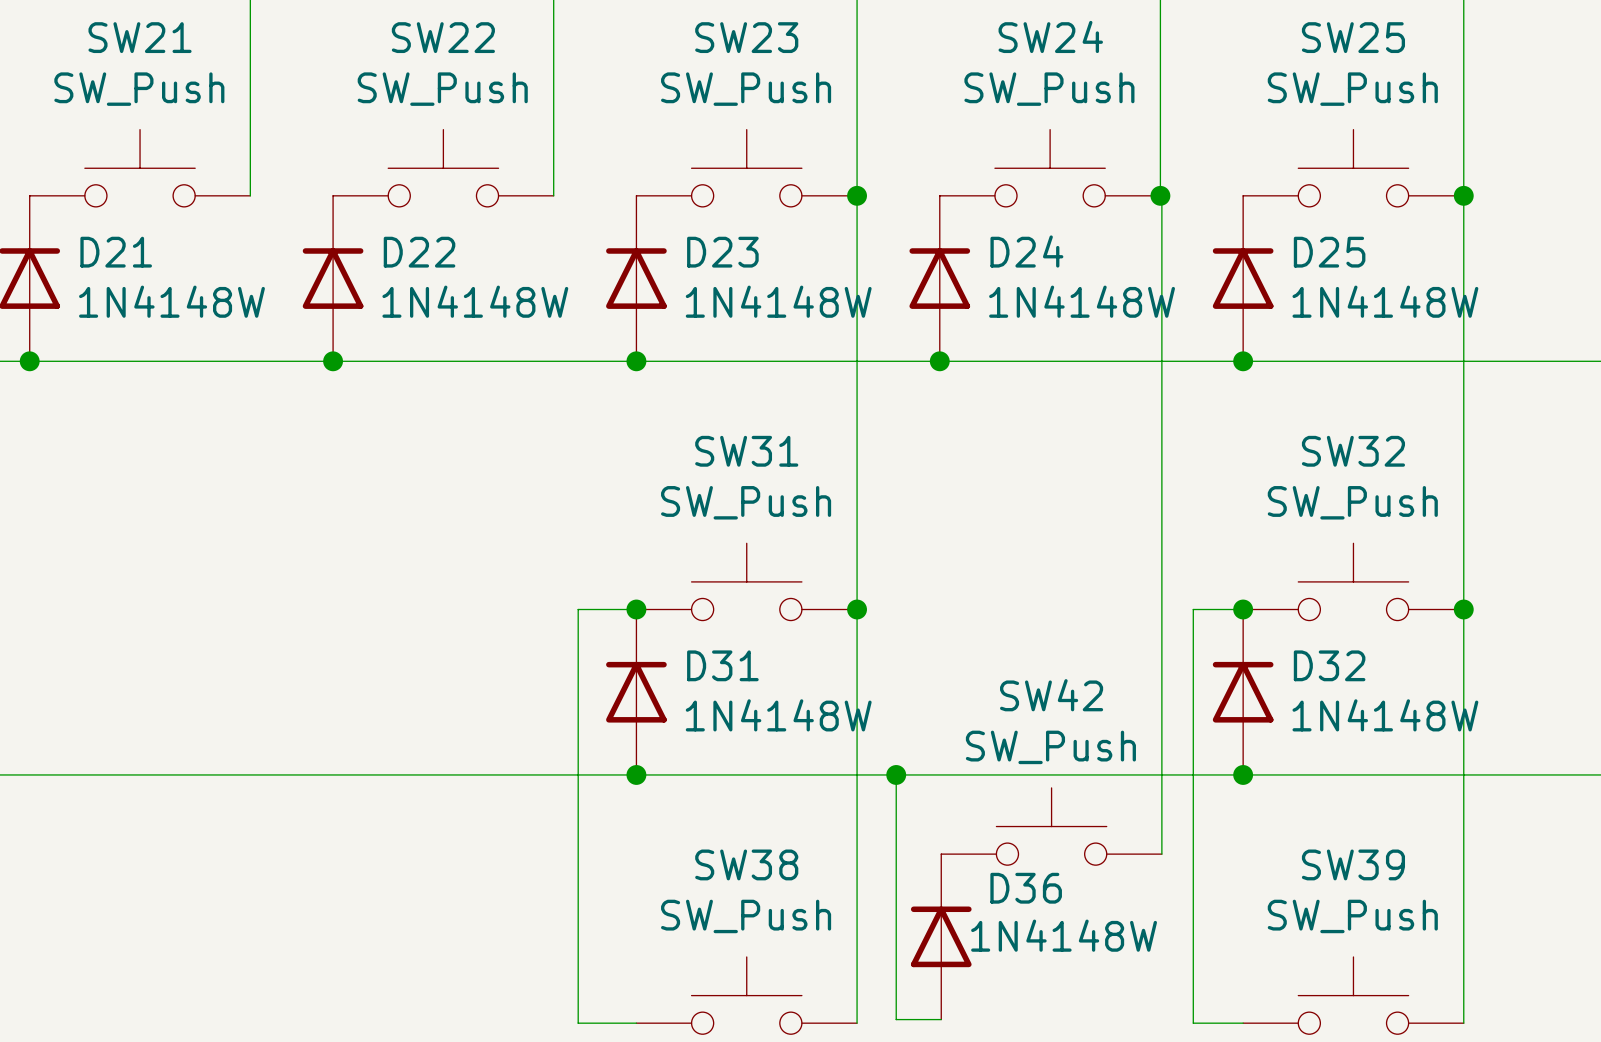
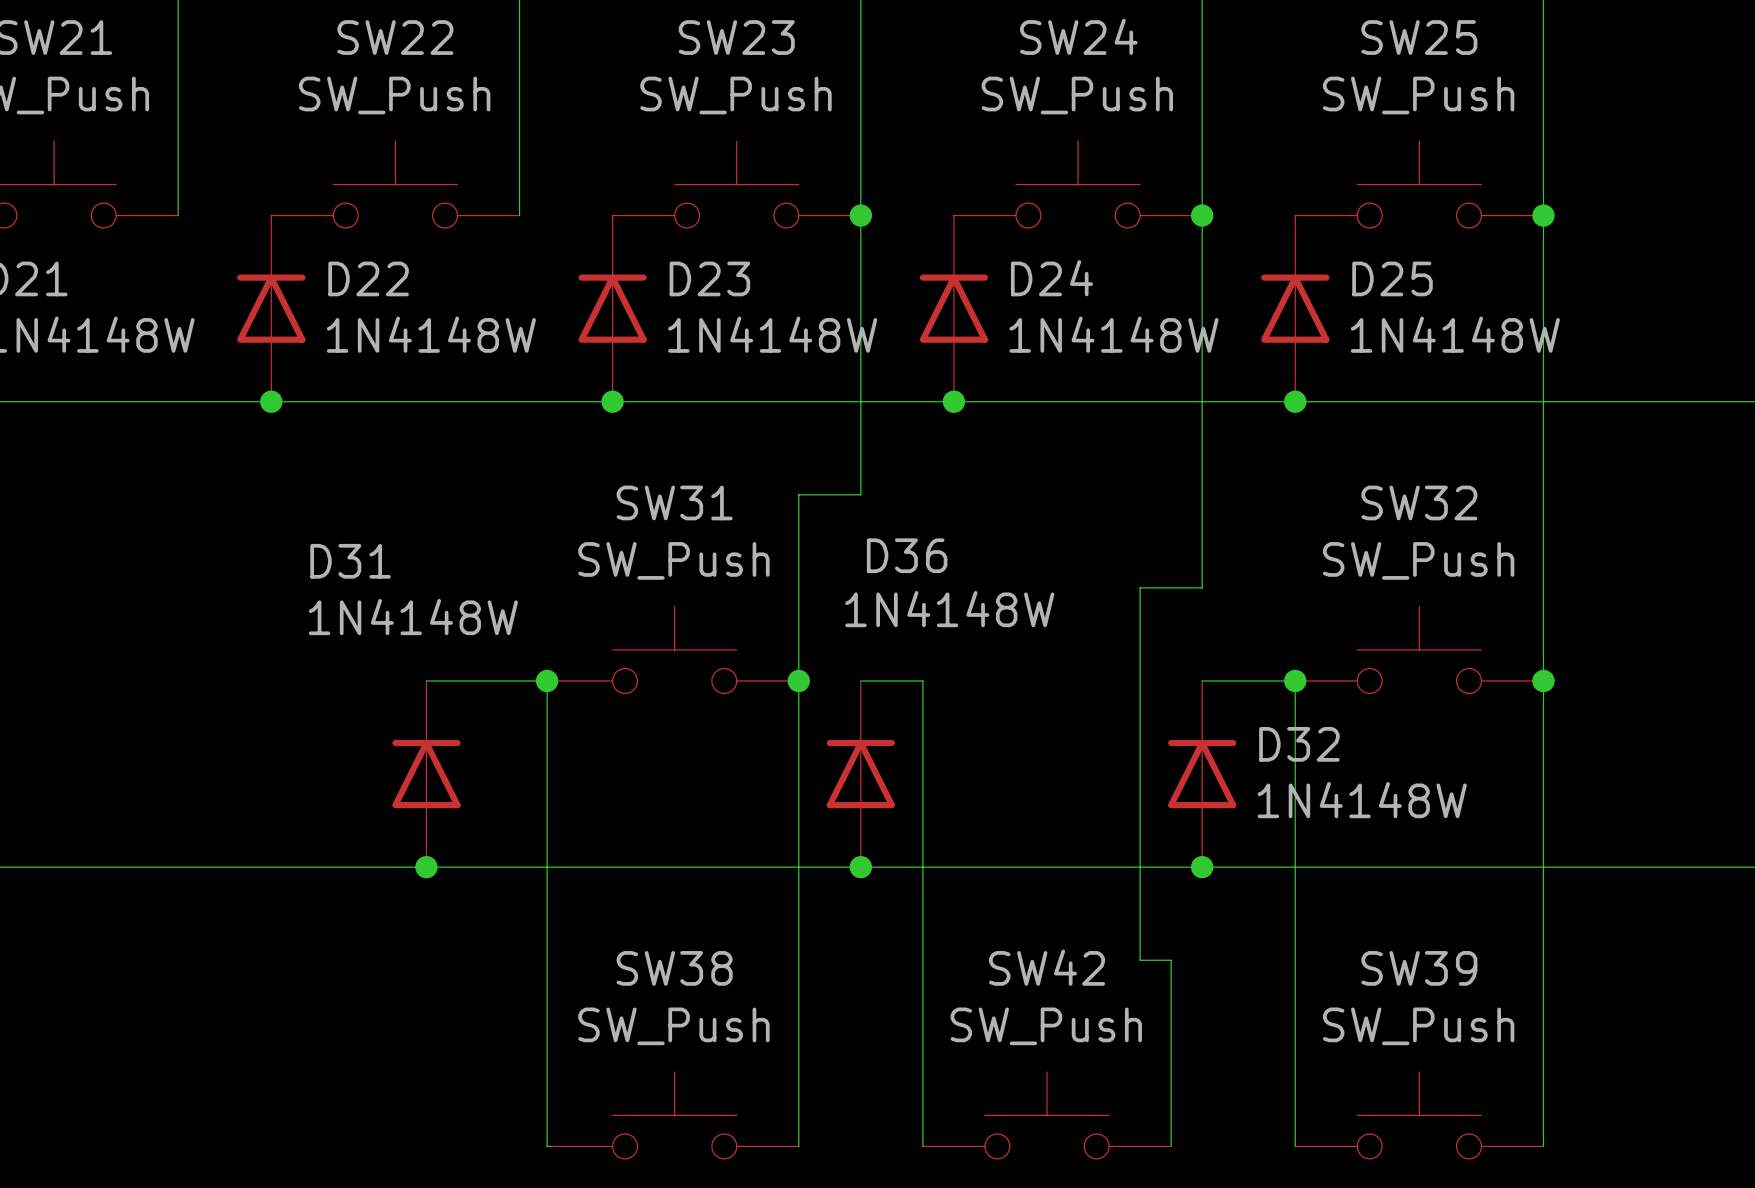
wire: (1160, 195) (1161, 854) -> (1202, 215) (1202, 587) (1140, 587) (1140, 960) (1171, 960) (1171, 1146)
wire: (857, 444) (857, 1023) -> (860, 494) (798, 494) (798, 1146)
SW31 position: (746, 581) -> (674, 649)
wire: none -> (426, 680) (547, 680)
junction position: (636, 609) -> (547, 680)
wire: none -> (860, 680) (922, 680) (922, 1146)
junction position: (857, 609) -> (798, 680)
wire: none -> (1202, 680) (1239, 680)
wire: (1193, 609) (1193, 1023) (1243, 1023) -> (1295, 680) (1295, 1146)
D31 name position: D31 (722, 665) -> D31 (350, 561)
D31 position: (636, 692) -> (426, 774)
D32 position: (1243, 692) -> (1202, 774)
D31 value position: 1N4148W (778, 715) -> 1N4148W (413, 617)
junction: none -> (426, 867)
junction: (636, 774) -> none
wire: (896, 774) (896, 1019) (941, 1019) -> none
junction position: (896, 774) -> (860, 867)
junction position: (1243, 774) -> (1202, 867)
SW42 position: (1051, 826) -> (1047, 1115)
D36 name position: D36 (1026, 888) -> D36 (907, 555)
D36 value position: 1N4148W (1064, 935) -> 1N4148W (949, 609)
D36 position: (941, 936) -> (860, 774)
SW38 position: (746, 995) -> (674, 1115)

